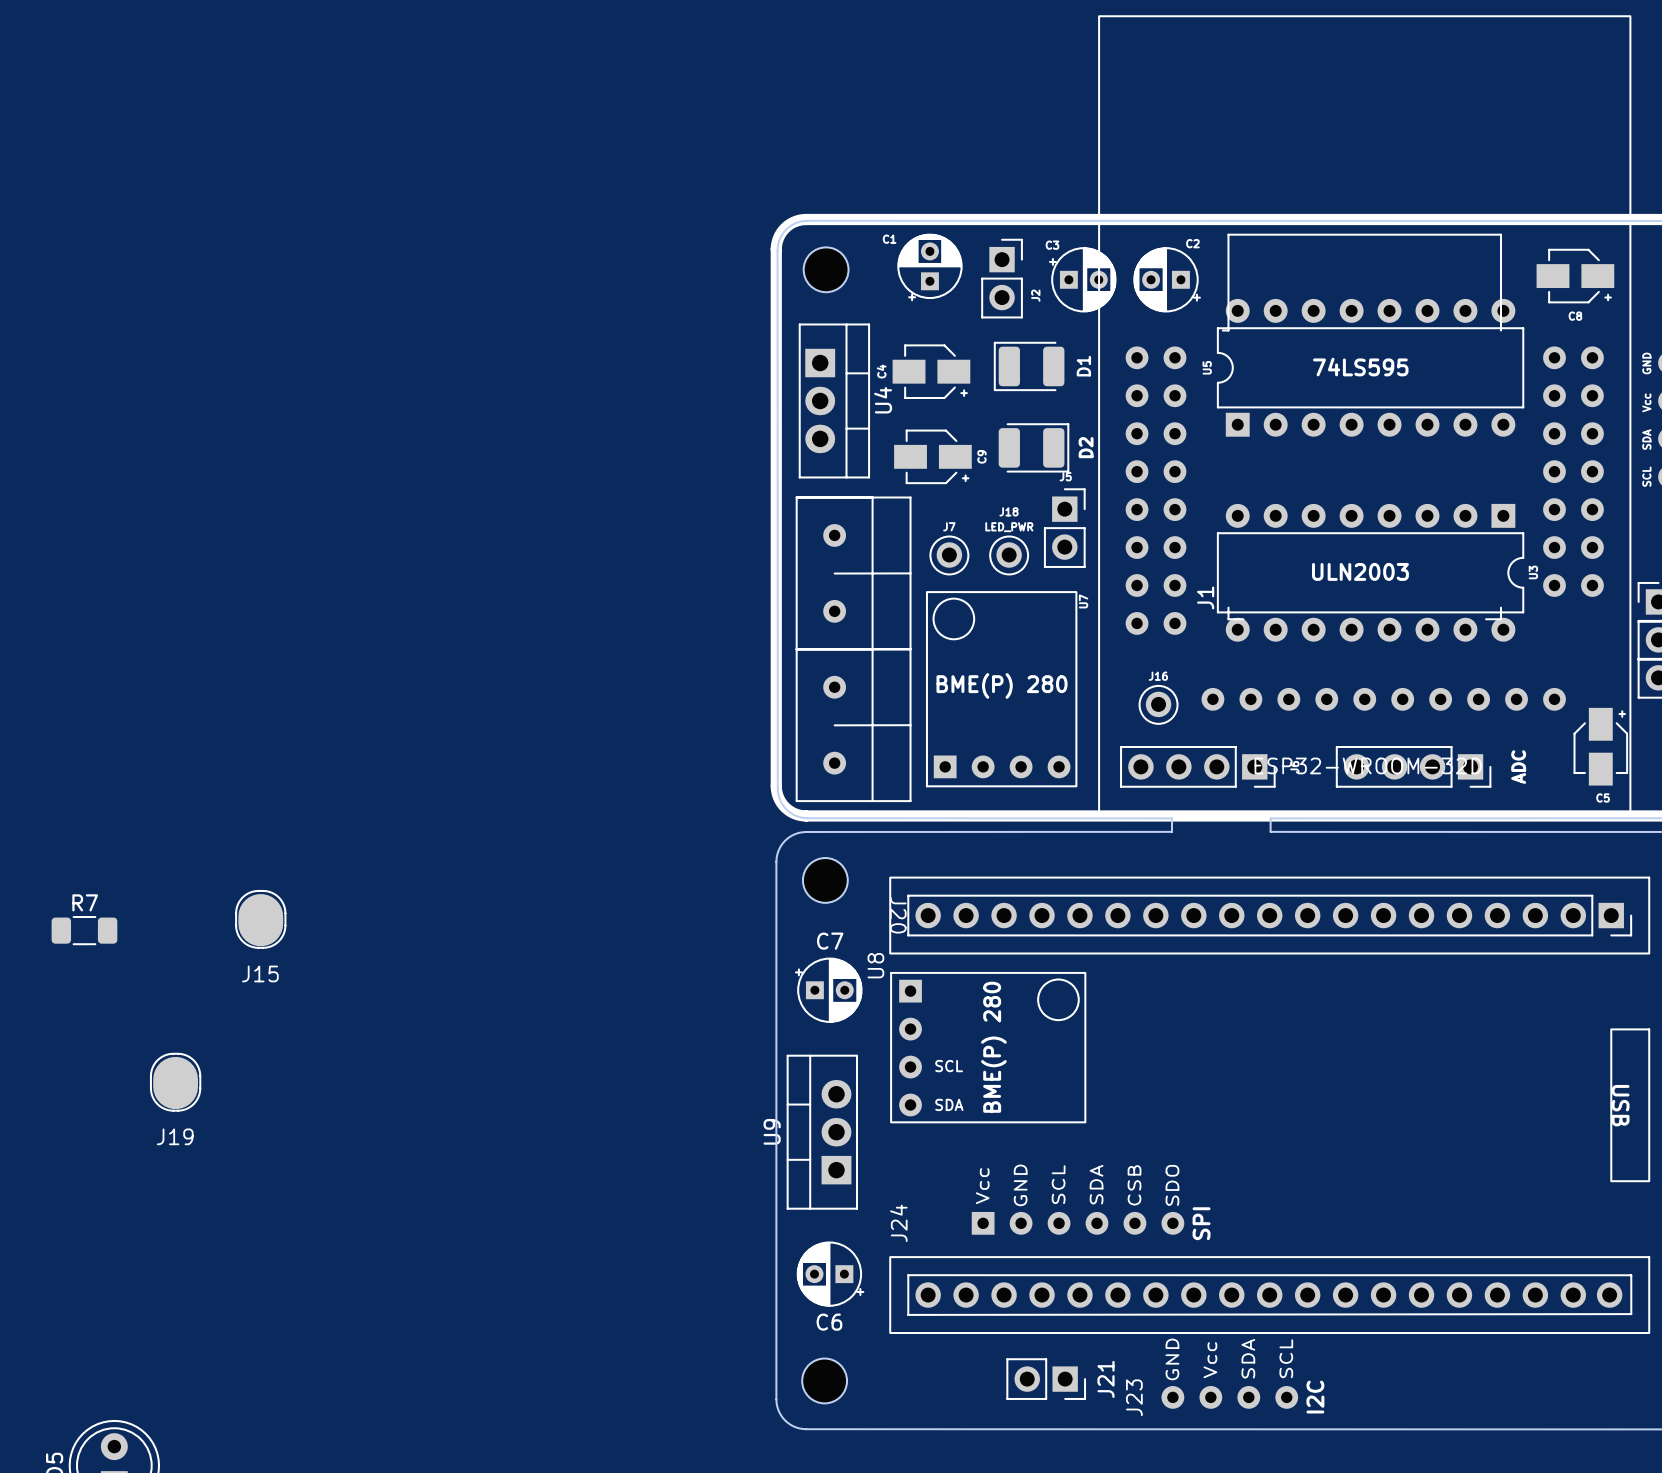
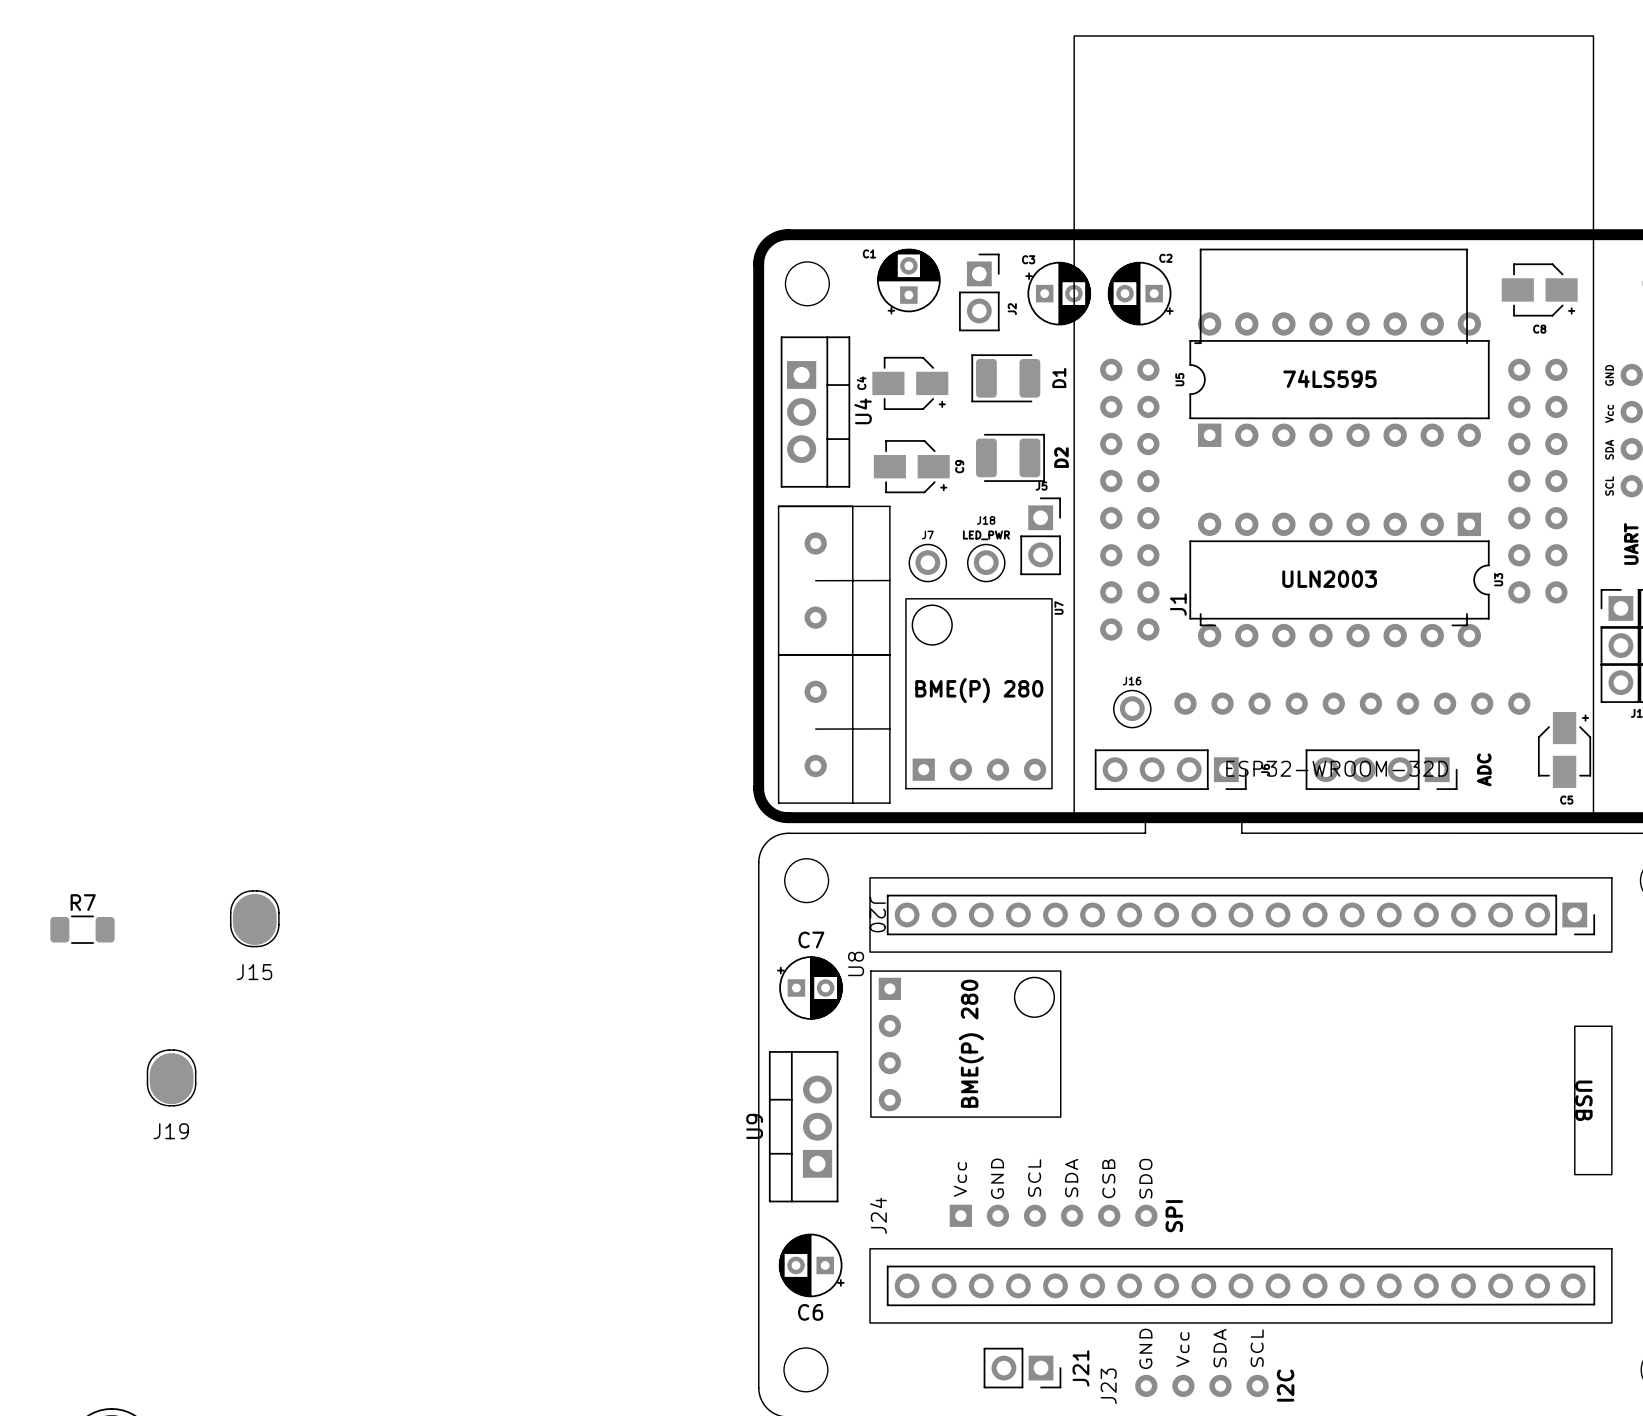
text: SCL (949, 1066) -> none
text: SDA (949, 1104) -> none

